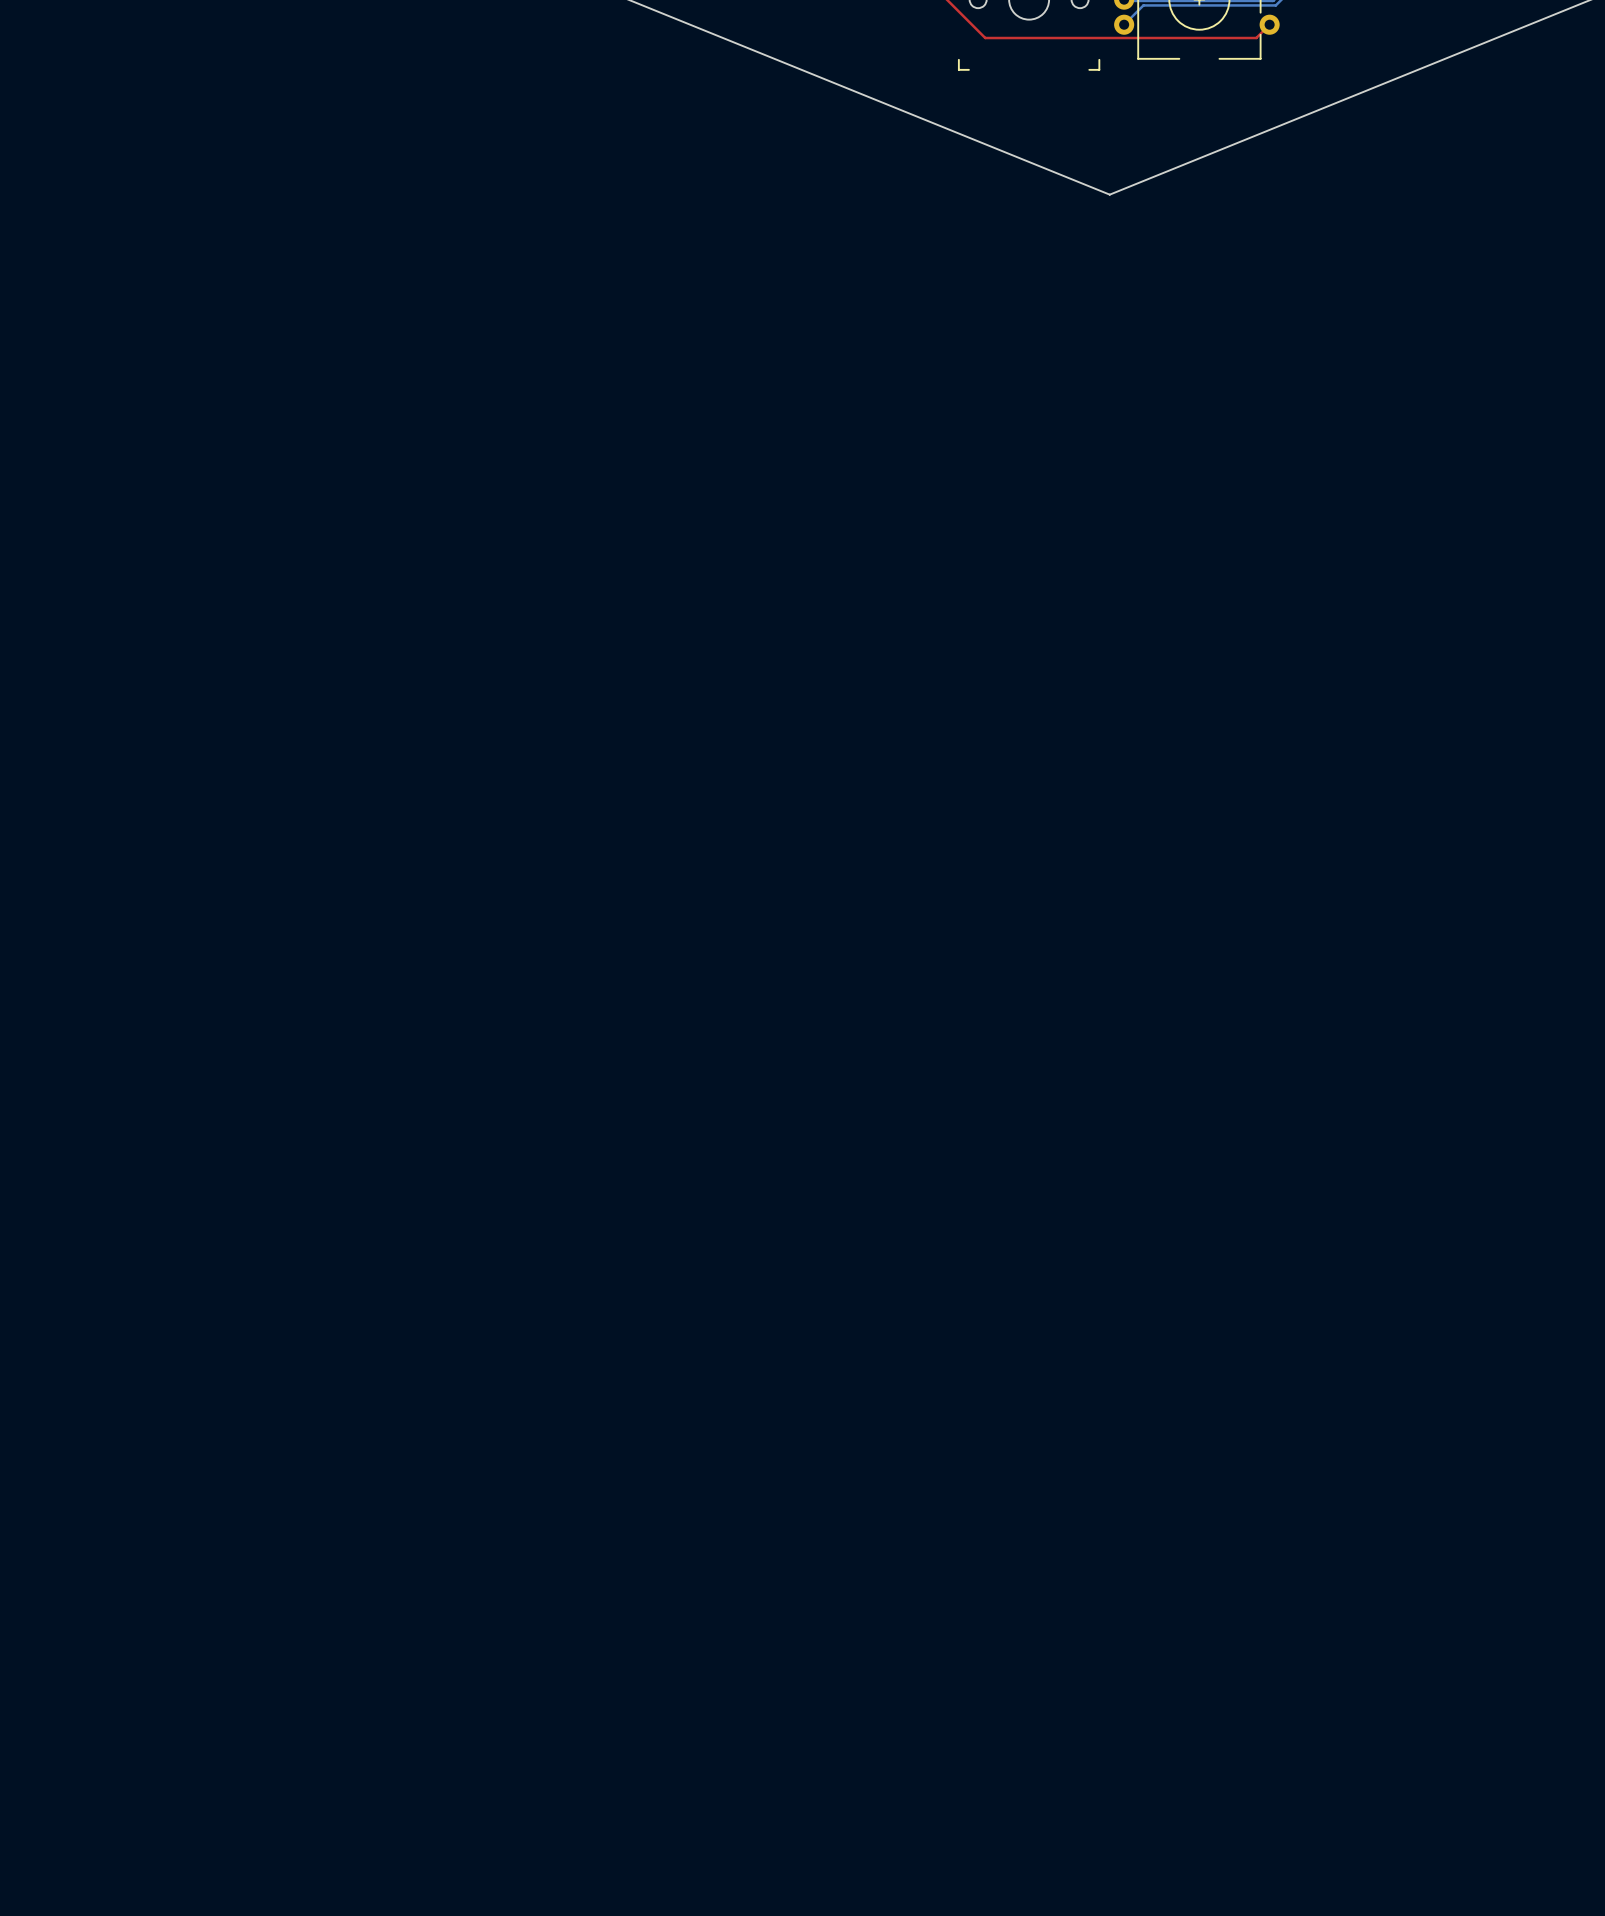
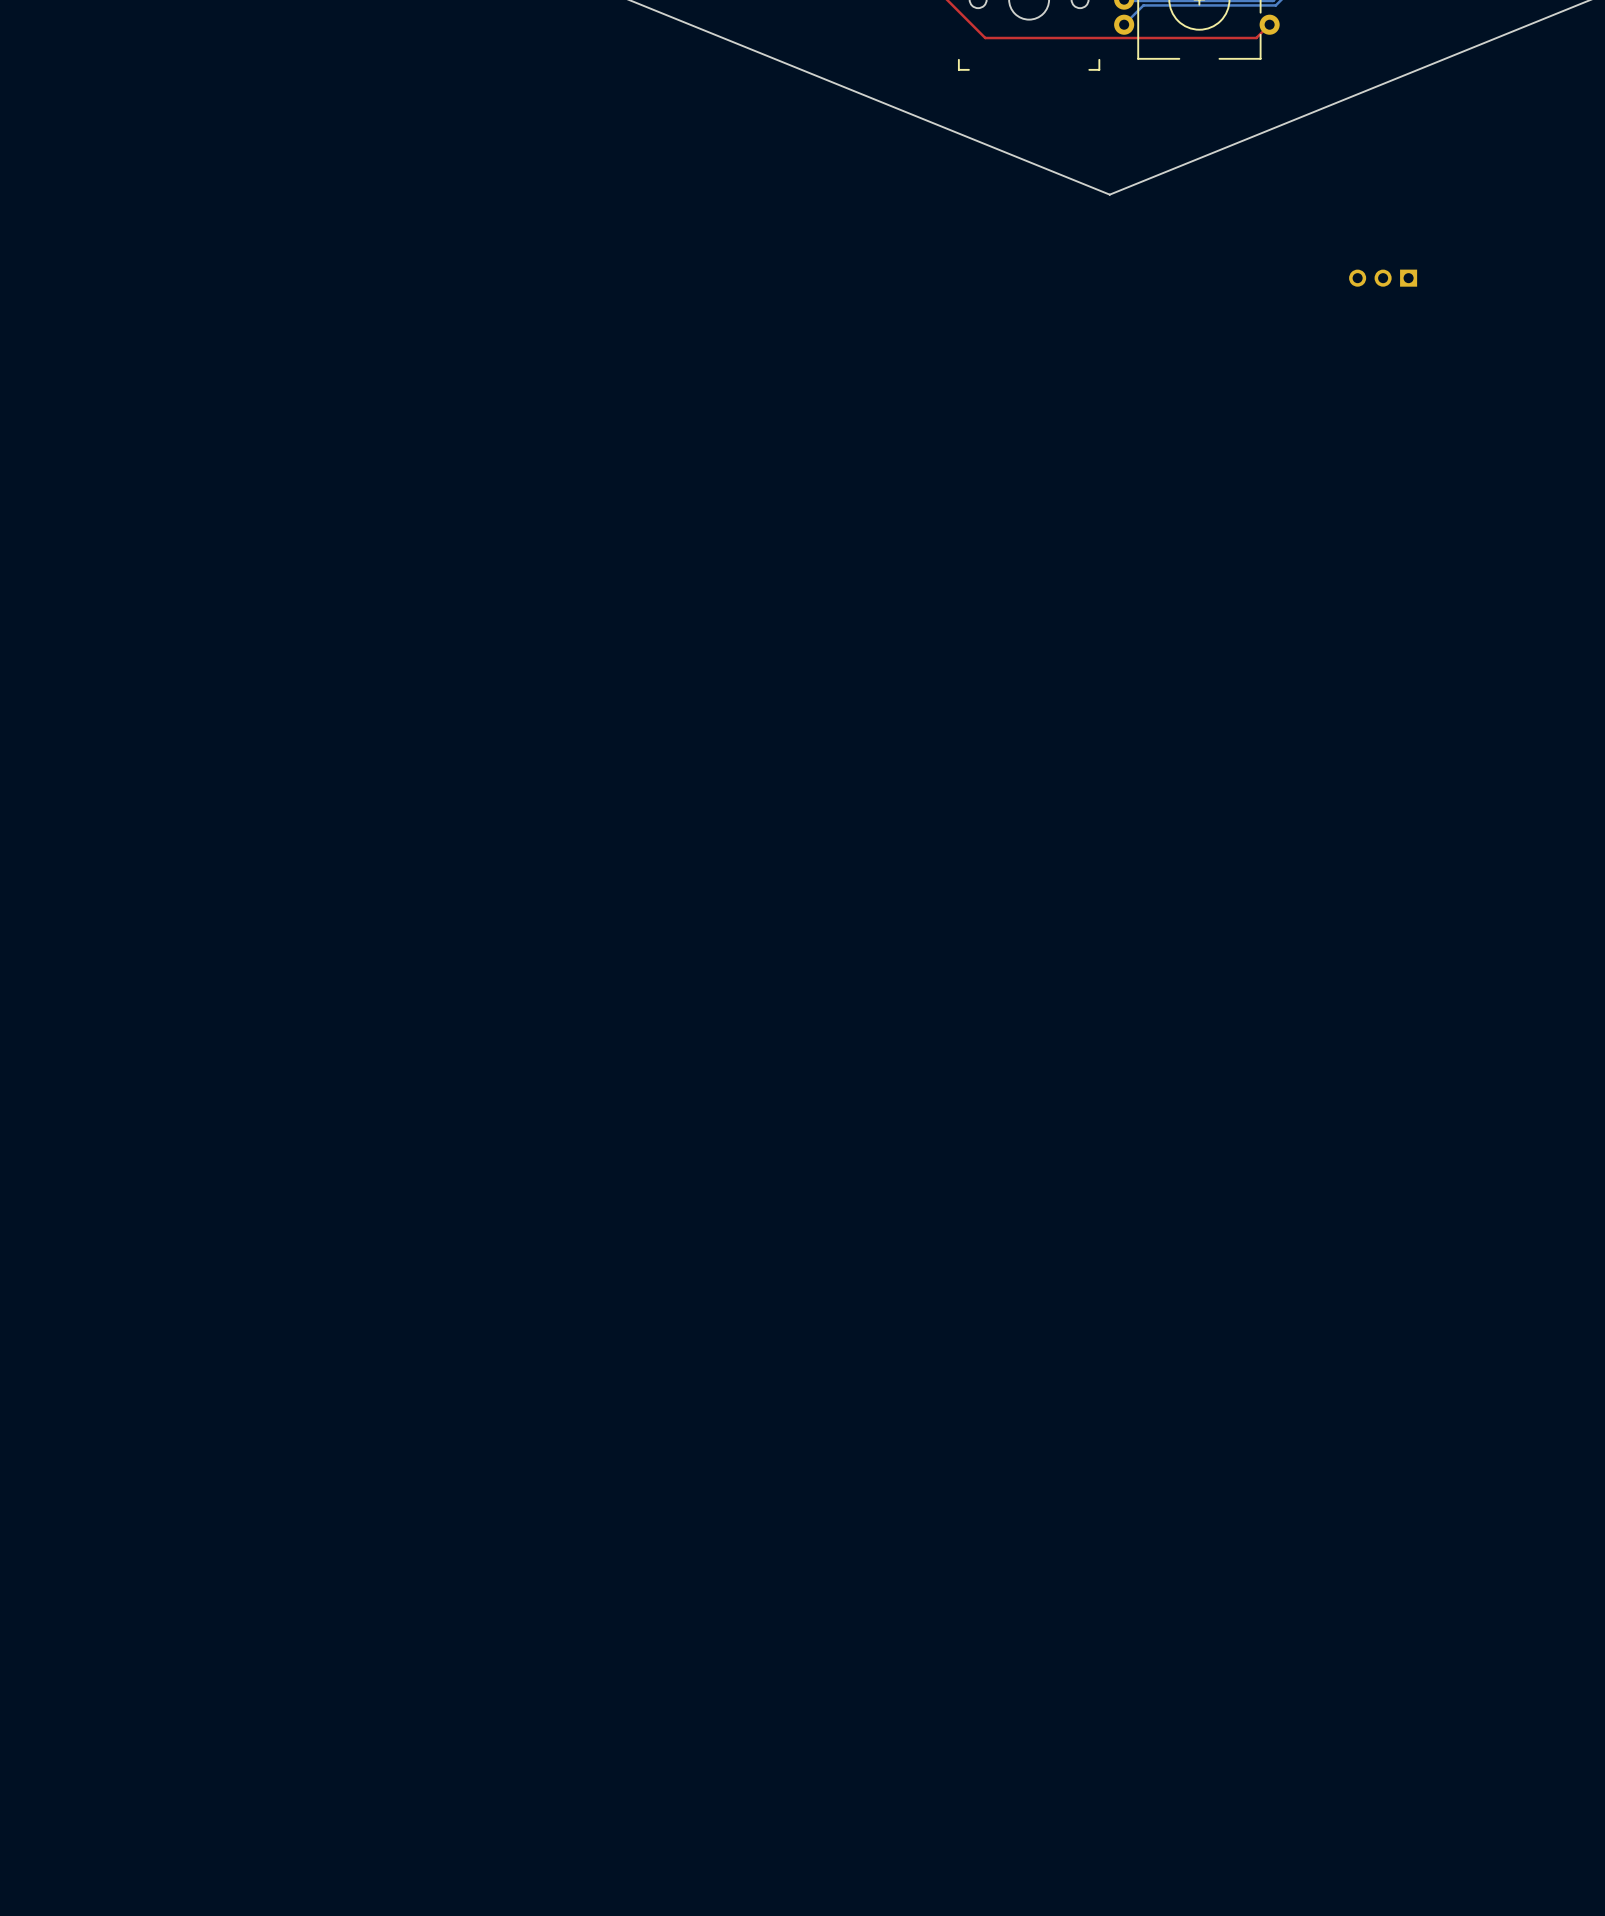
part: none -> (1383, 278)

